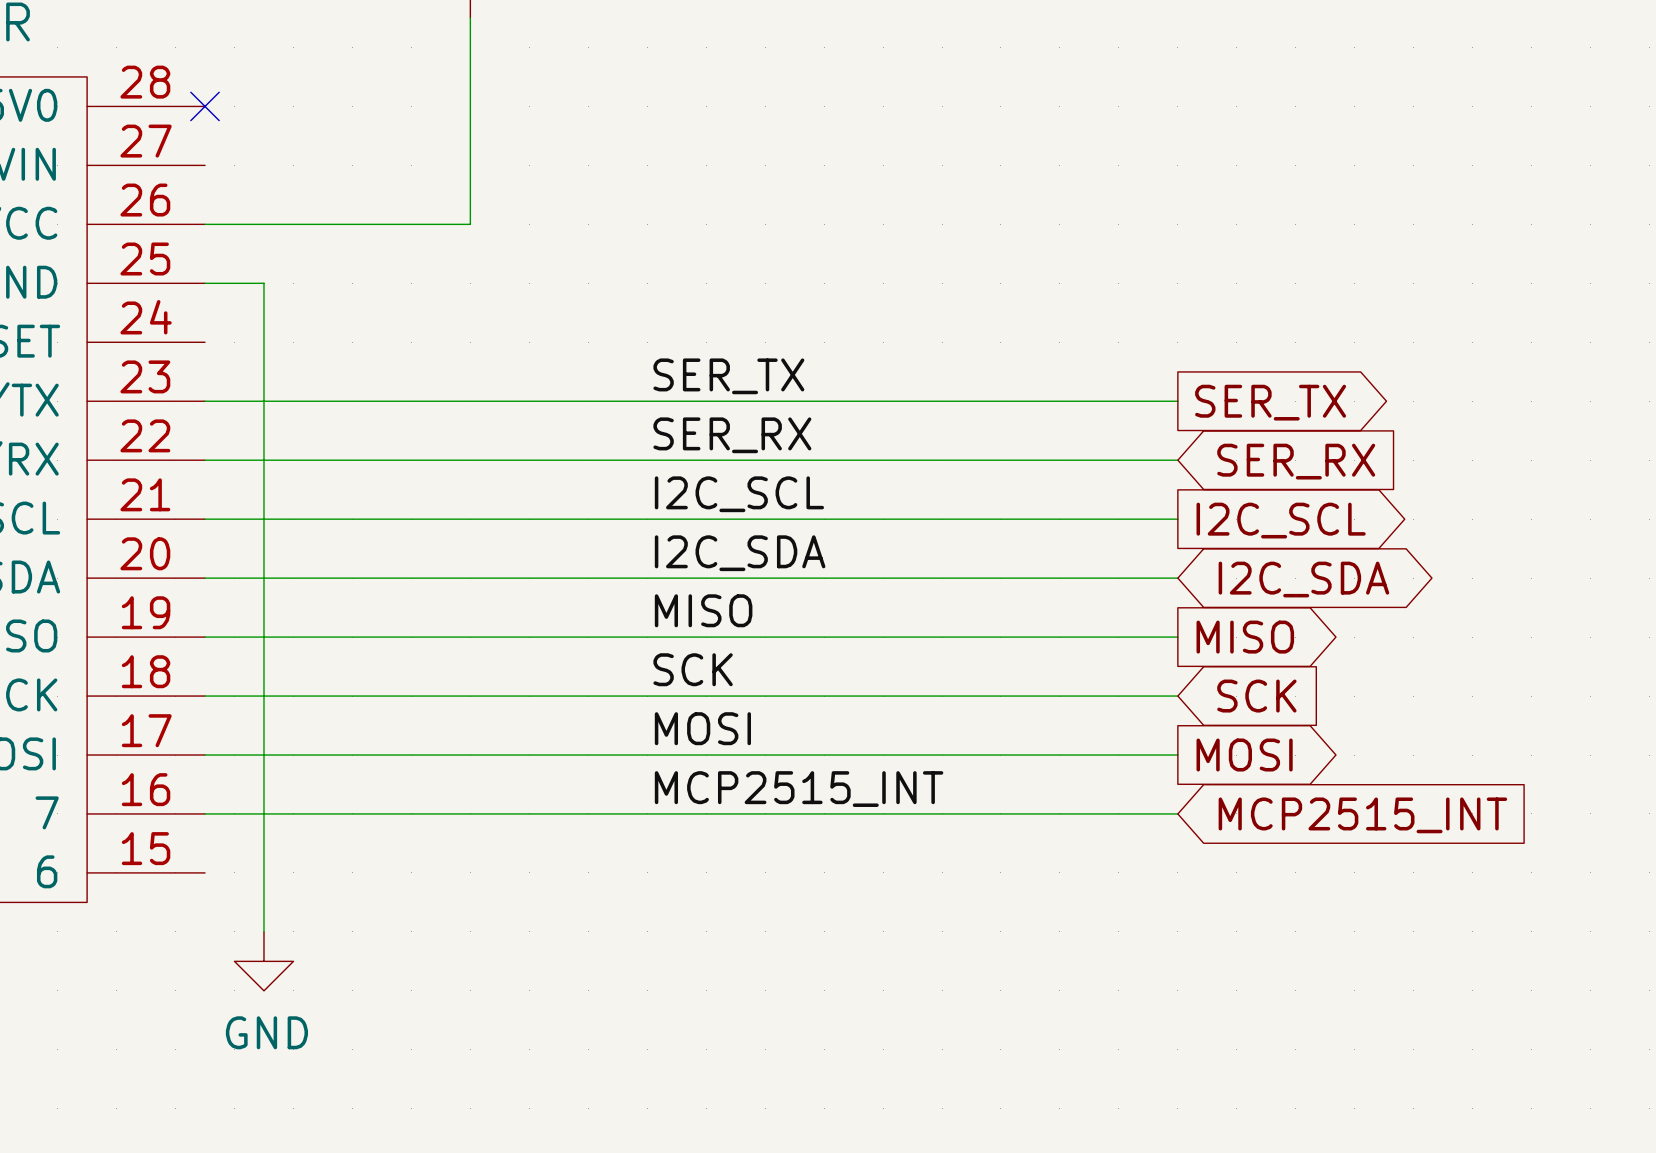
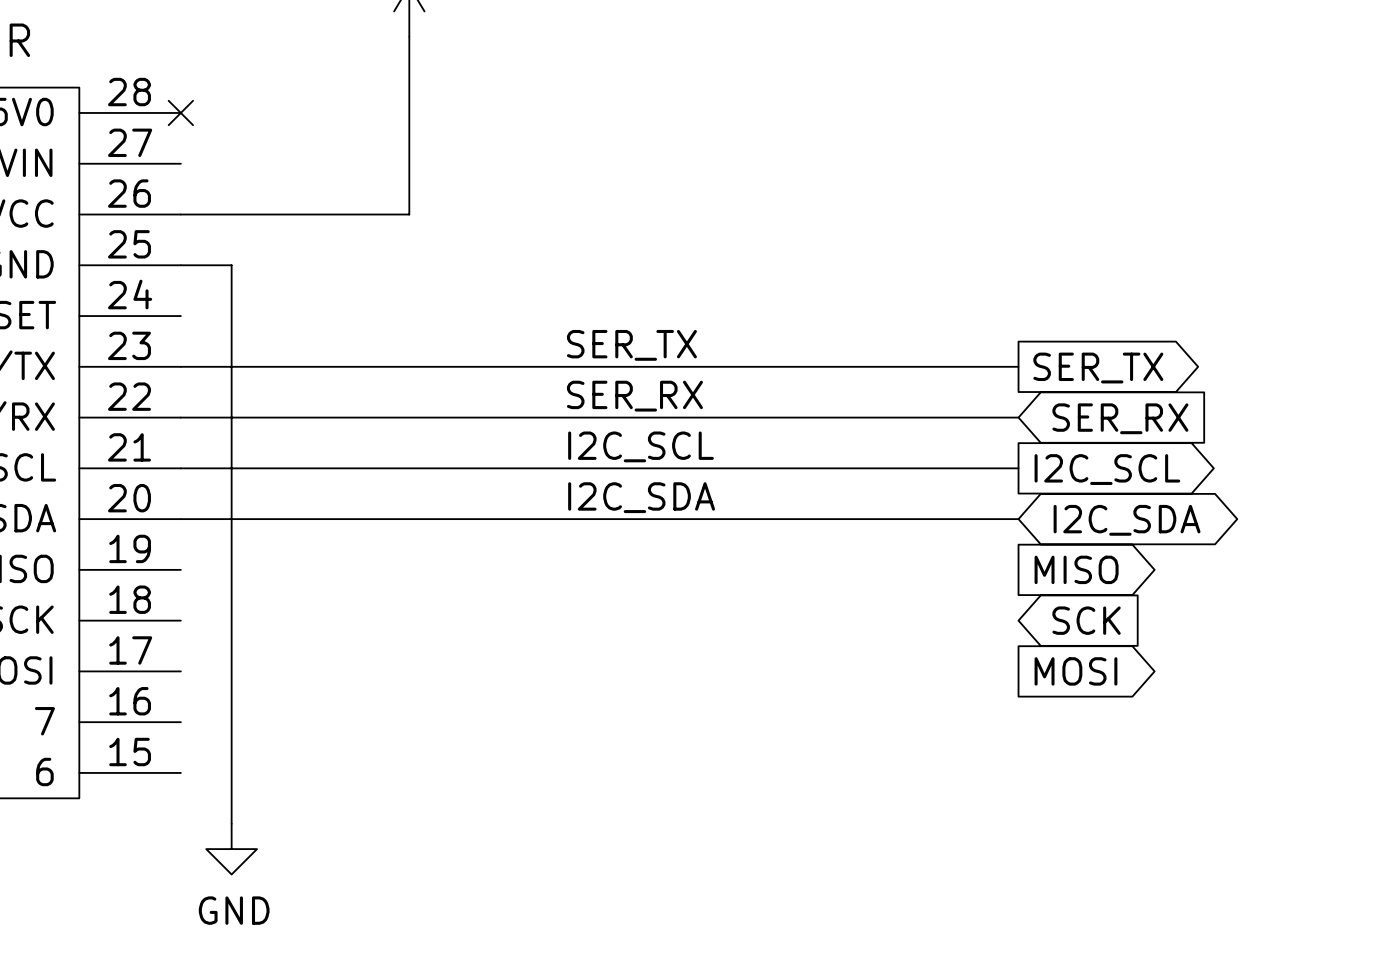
label: MISO (703, 610) -> none
wire: (205, 637) (1177, 637) -> none
label: SCK (693, 669) -> none
wire: (205, 696) (1177, 696) -> none
label: MOSI (702, 728) -> none
wire: (205, 755) (1177, 755) -> none
label: MCP2515_INT (799, 789) -> none
wire: (205, 813) (1177, 813) -> none
global label: MCP2515_INT (1362, 815) -> none

